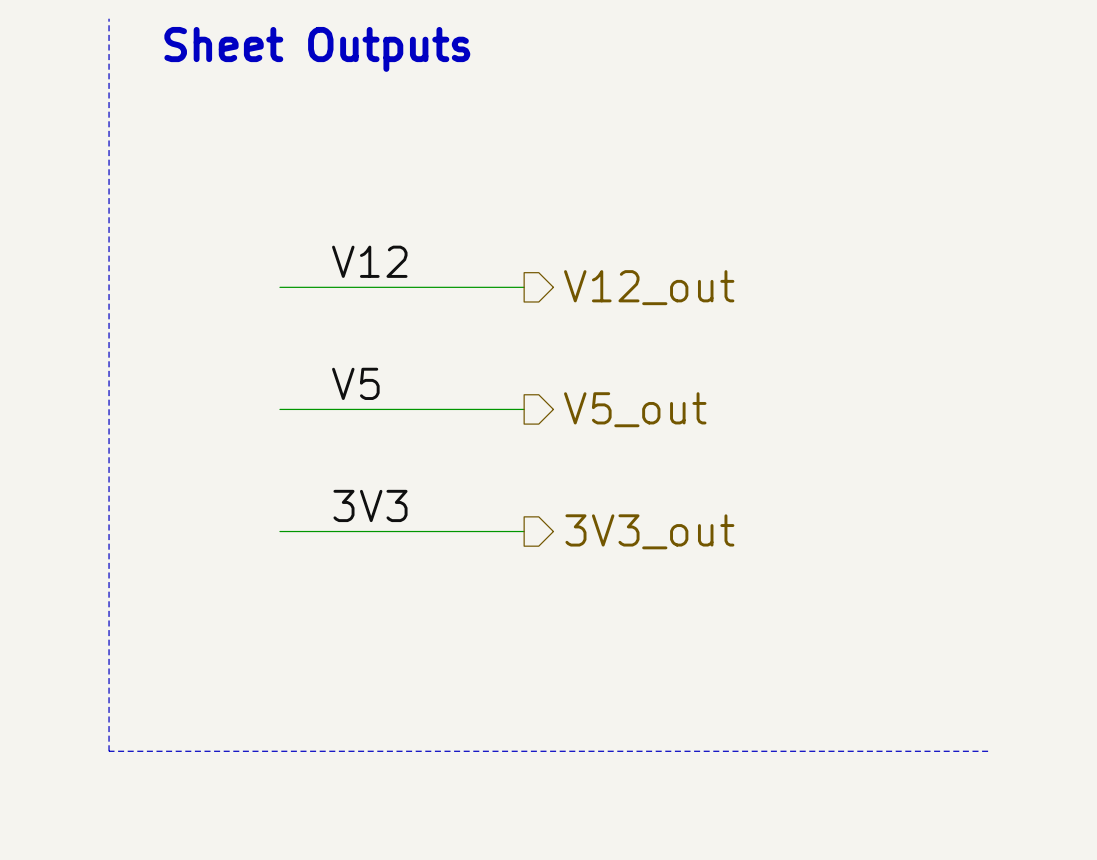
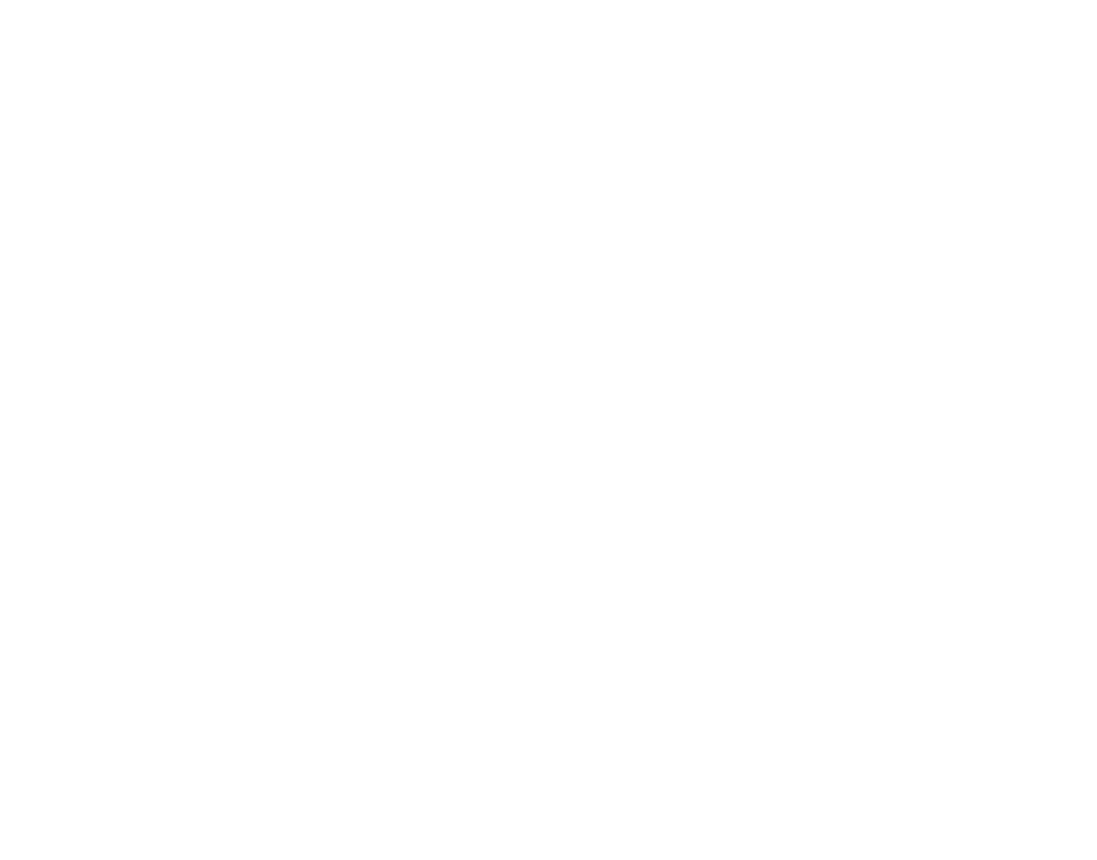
line: (109, 18) (109, 751) (988, 751) -> none
text: Sheet Outputs (317, 49) -> none
label: V12 (369, 261) -> none
wire: (279, 287) (524, 287) -> none
hierarchical label: V12_out (649, 287) -> none
label: V5 (355, 383) -> none
wire: (279, 409) (524, 409) -> none
hierarchical label: V5_out (635, 409) -> none
label: 3V3 (370, 505) -> none
wire: (279, 531) (524, 531) -> none
hierarchical label: 3V3_out (649, 531) -> none

